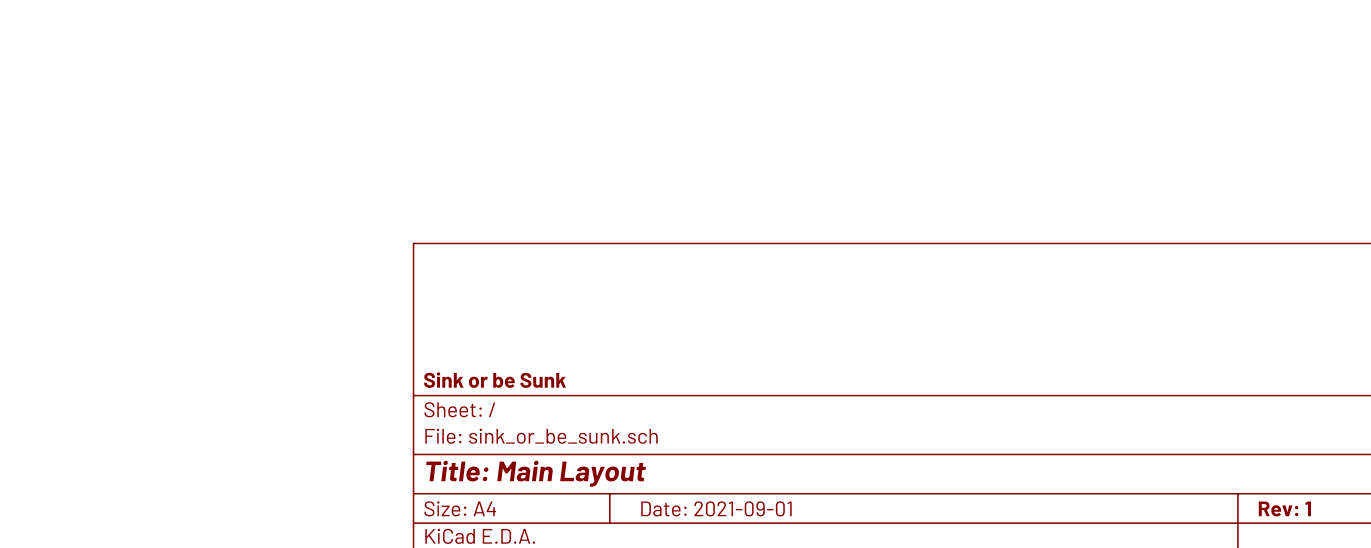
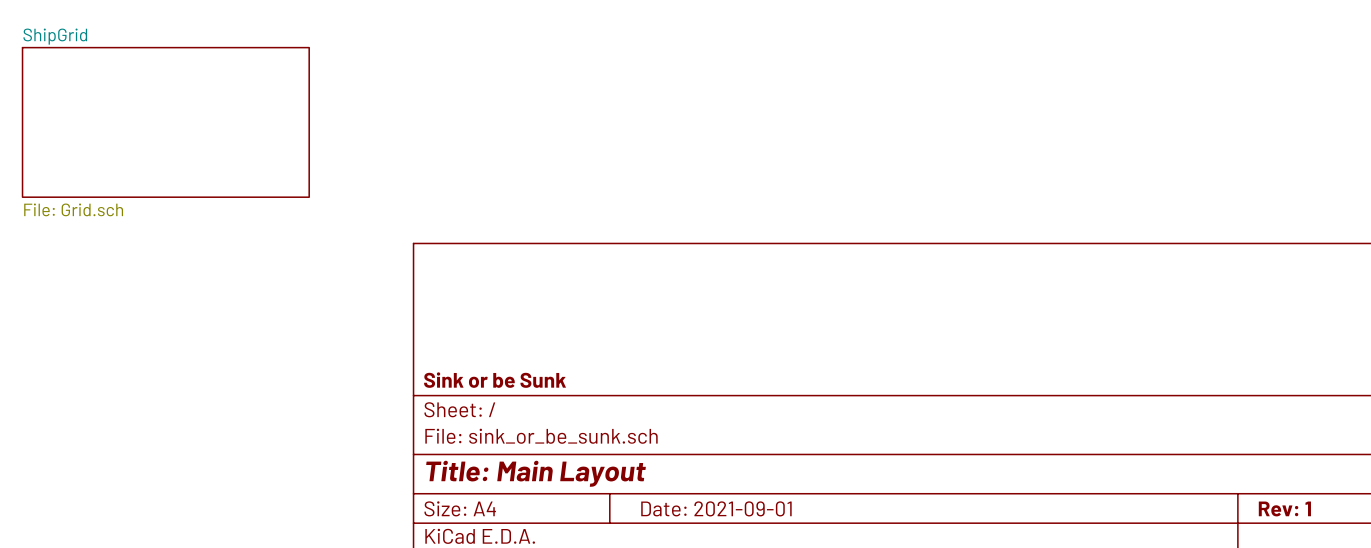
sheet ShipGrid: none -> File: Grid.sch (165, 122)

